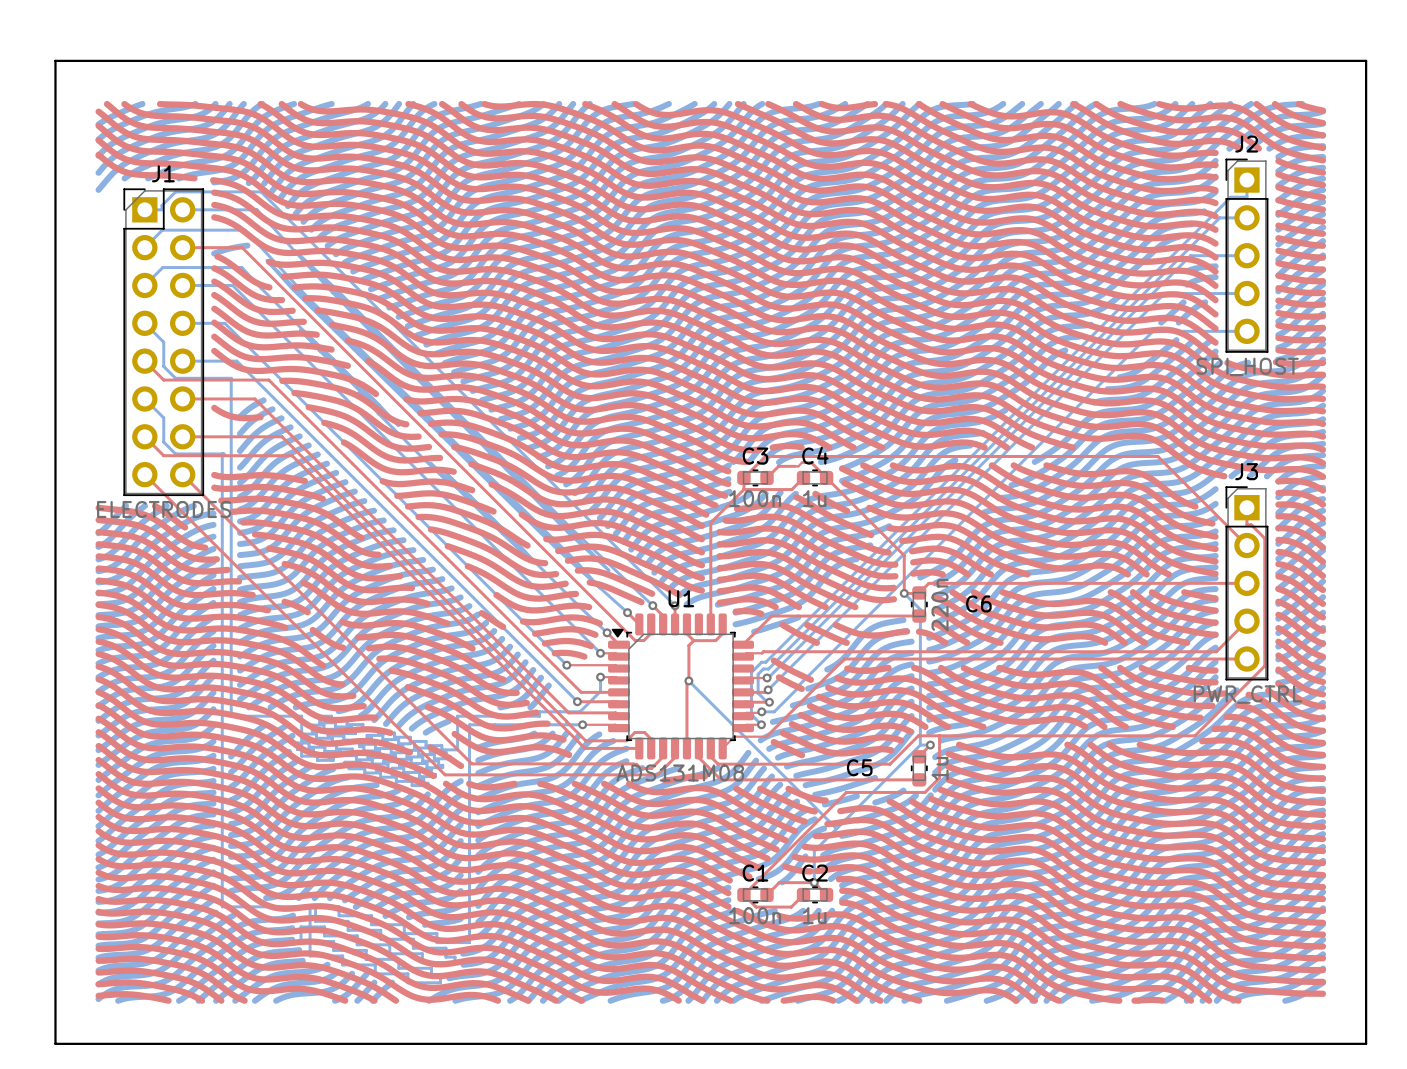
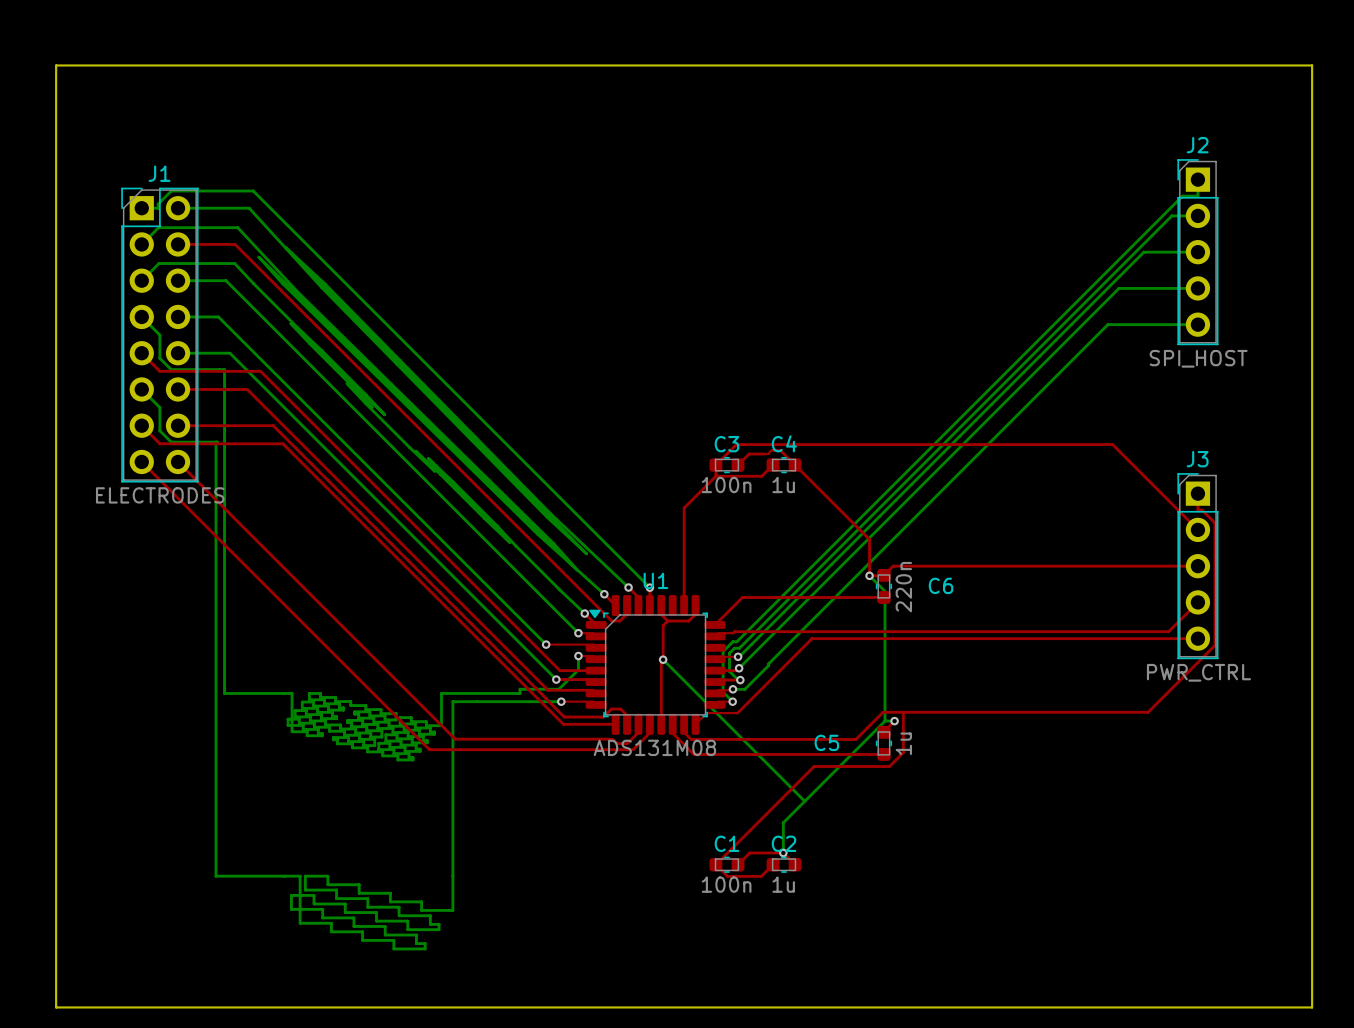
drawing: [95, 100, 1327, 1004] -> none

